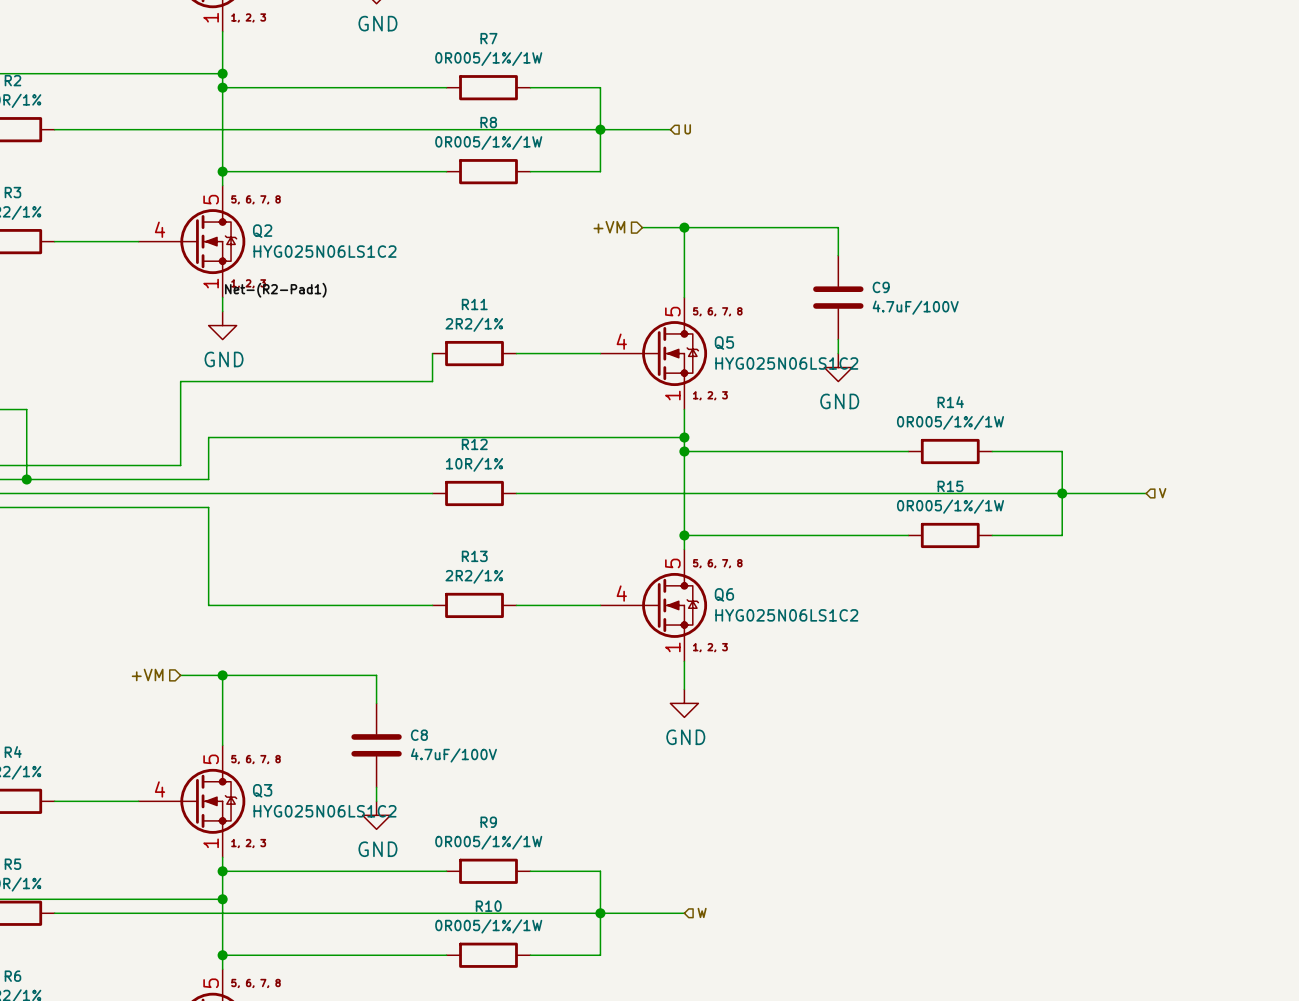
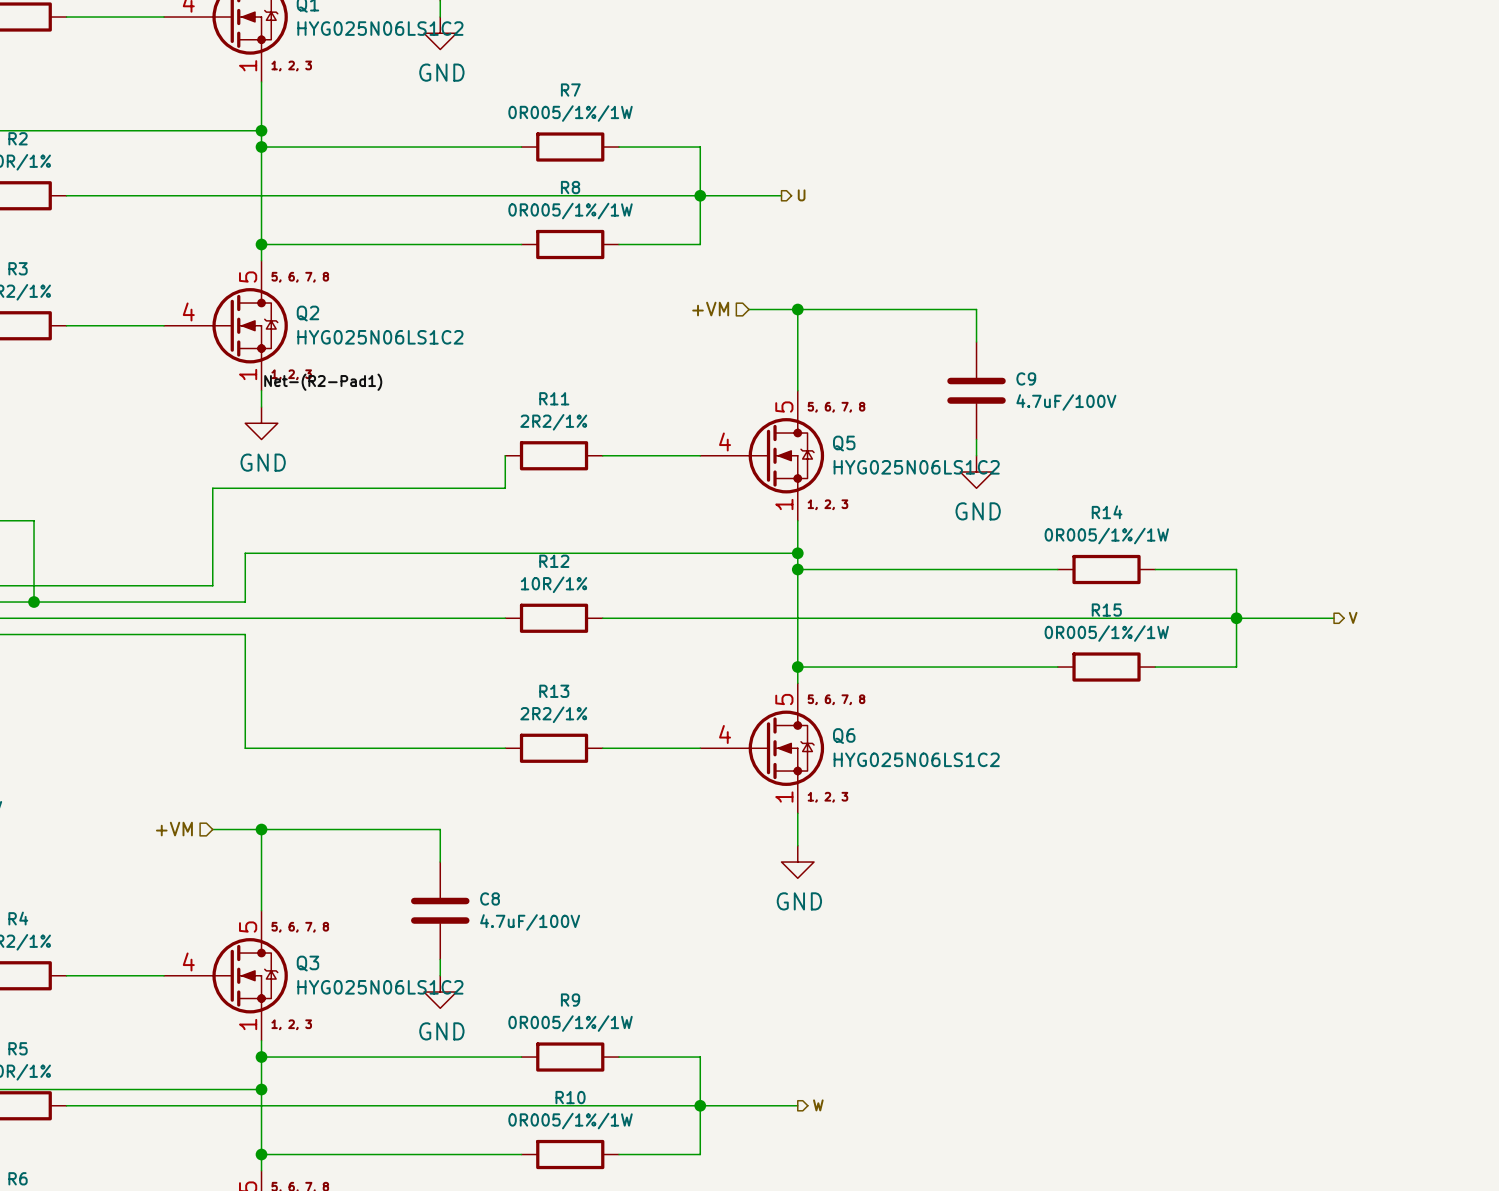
hierarchical label shape: input (687, 129) -> output (801, 195)
hierarchical label shape: input (1162, 493) -> output (1353, 617)
hierarchical label shape: input (702, 912) -> output (818, 1105)

